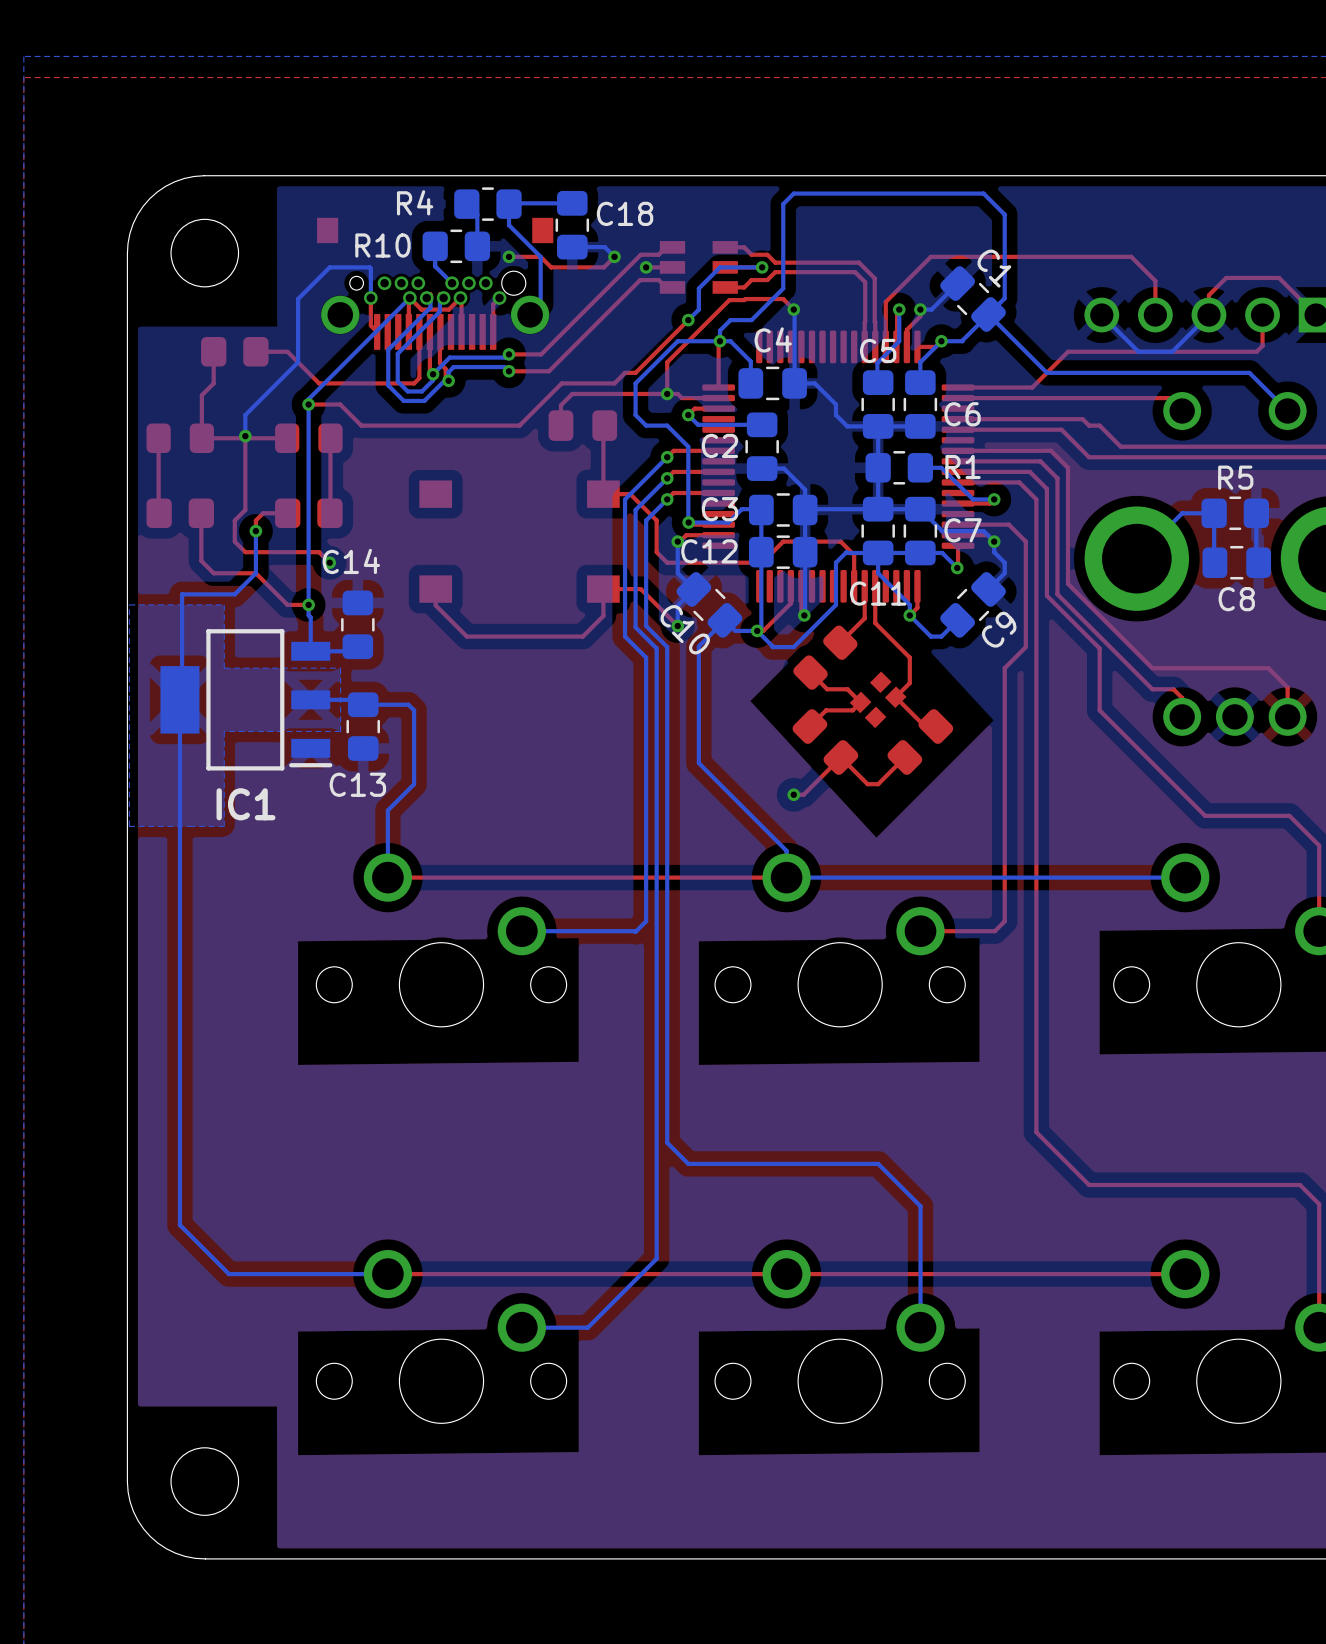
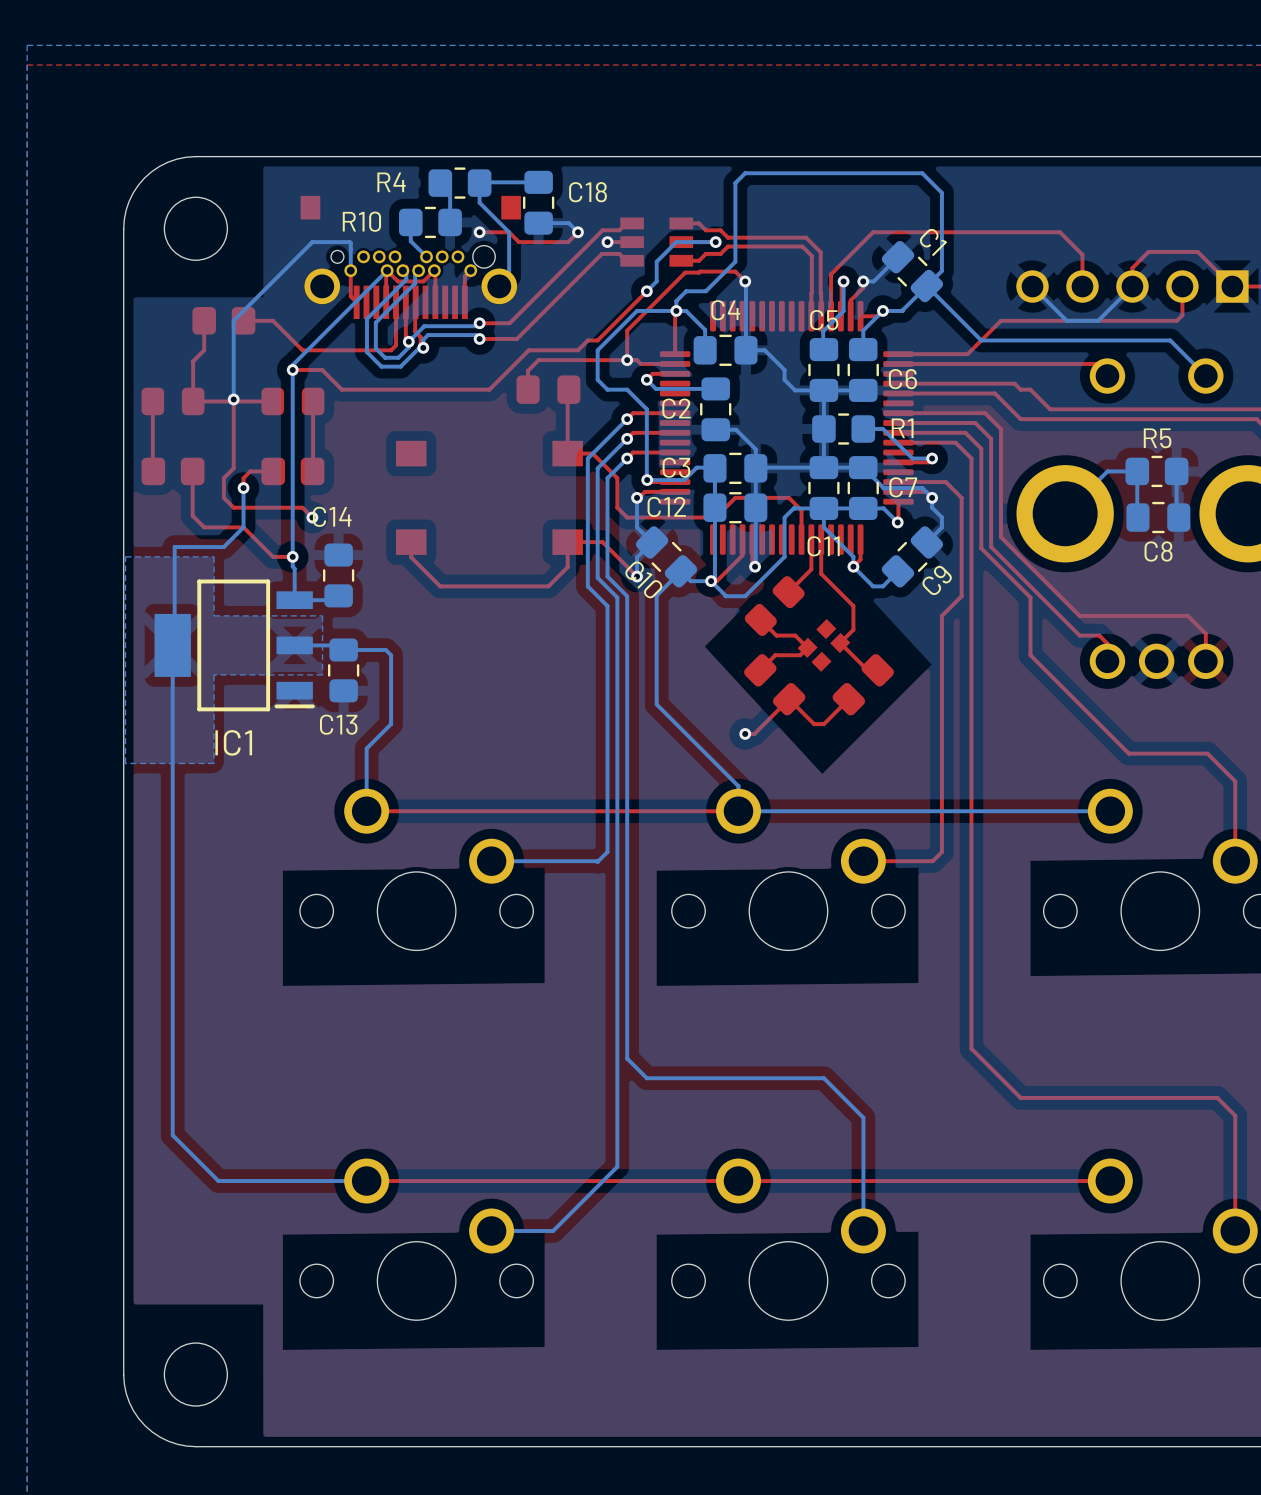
bottom track: (298, 299) (298, 362) (245, 415) -> (282, 271) (233, 320) (233, 379)

